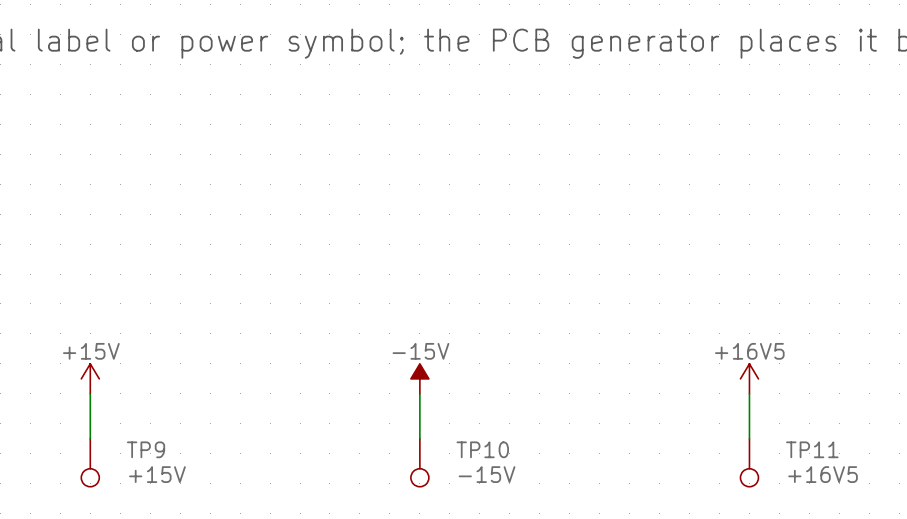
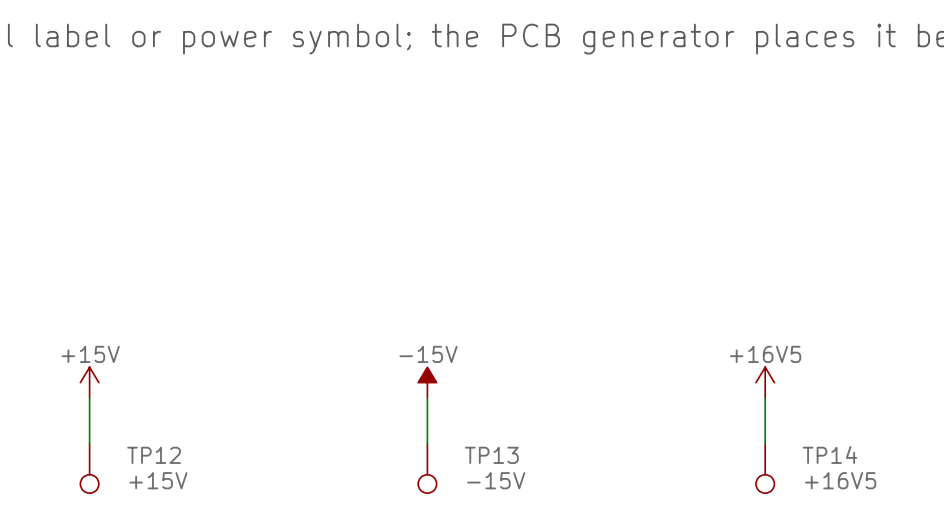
TP9 name: TP9 (146, 449) -> TP12 (154, 455)
TP10 name: TP10 (482, 449) -> TP13 (491, 455)
TP11 name: TP11 (812, 449) -> TP14 (830, 454)

